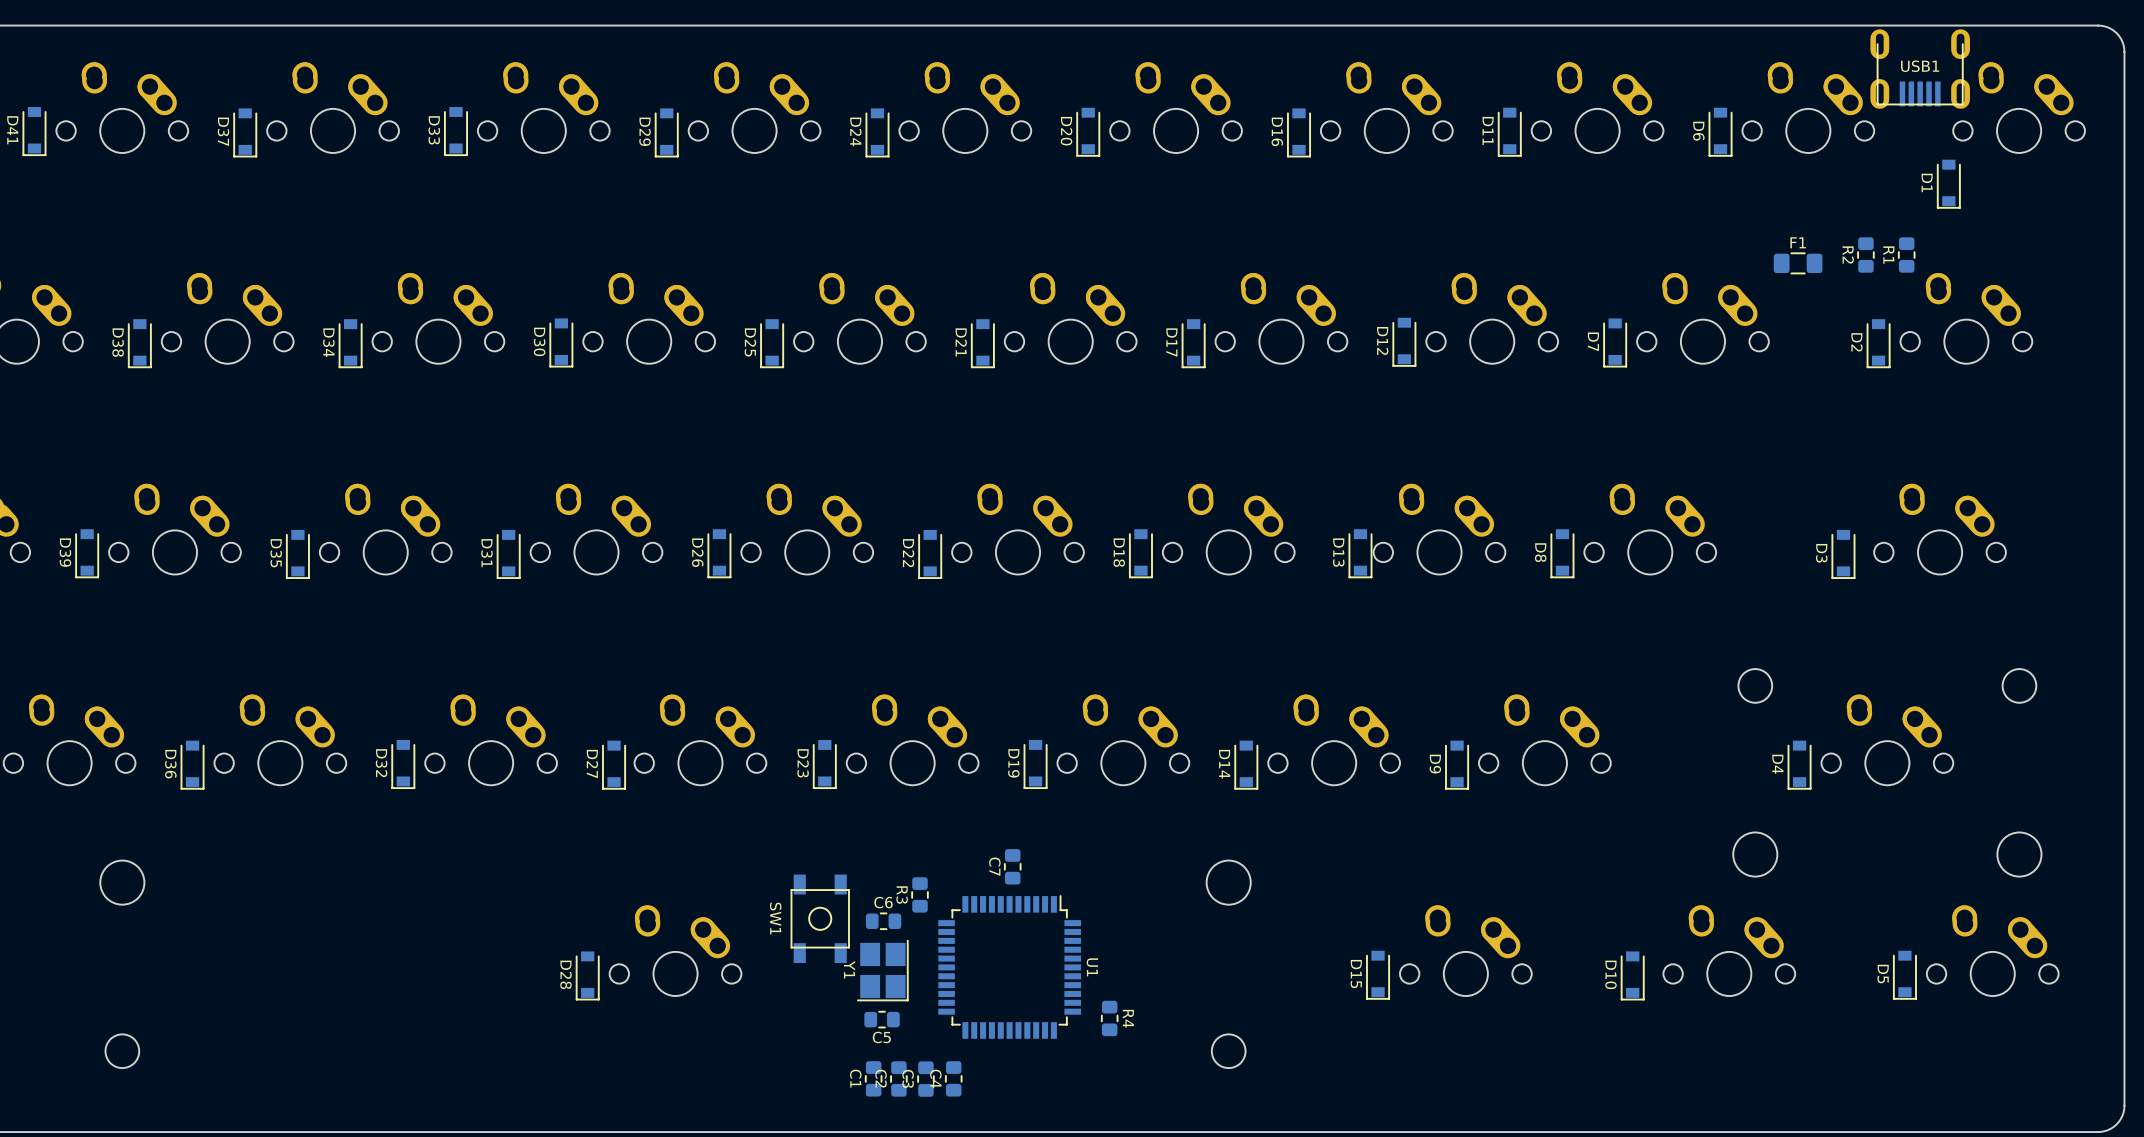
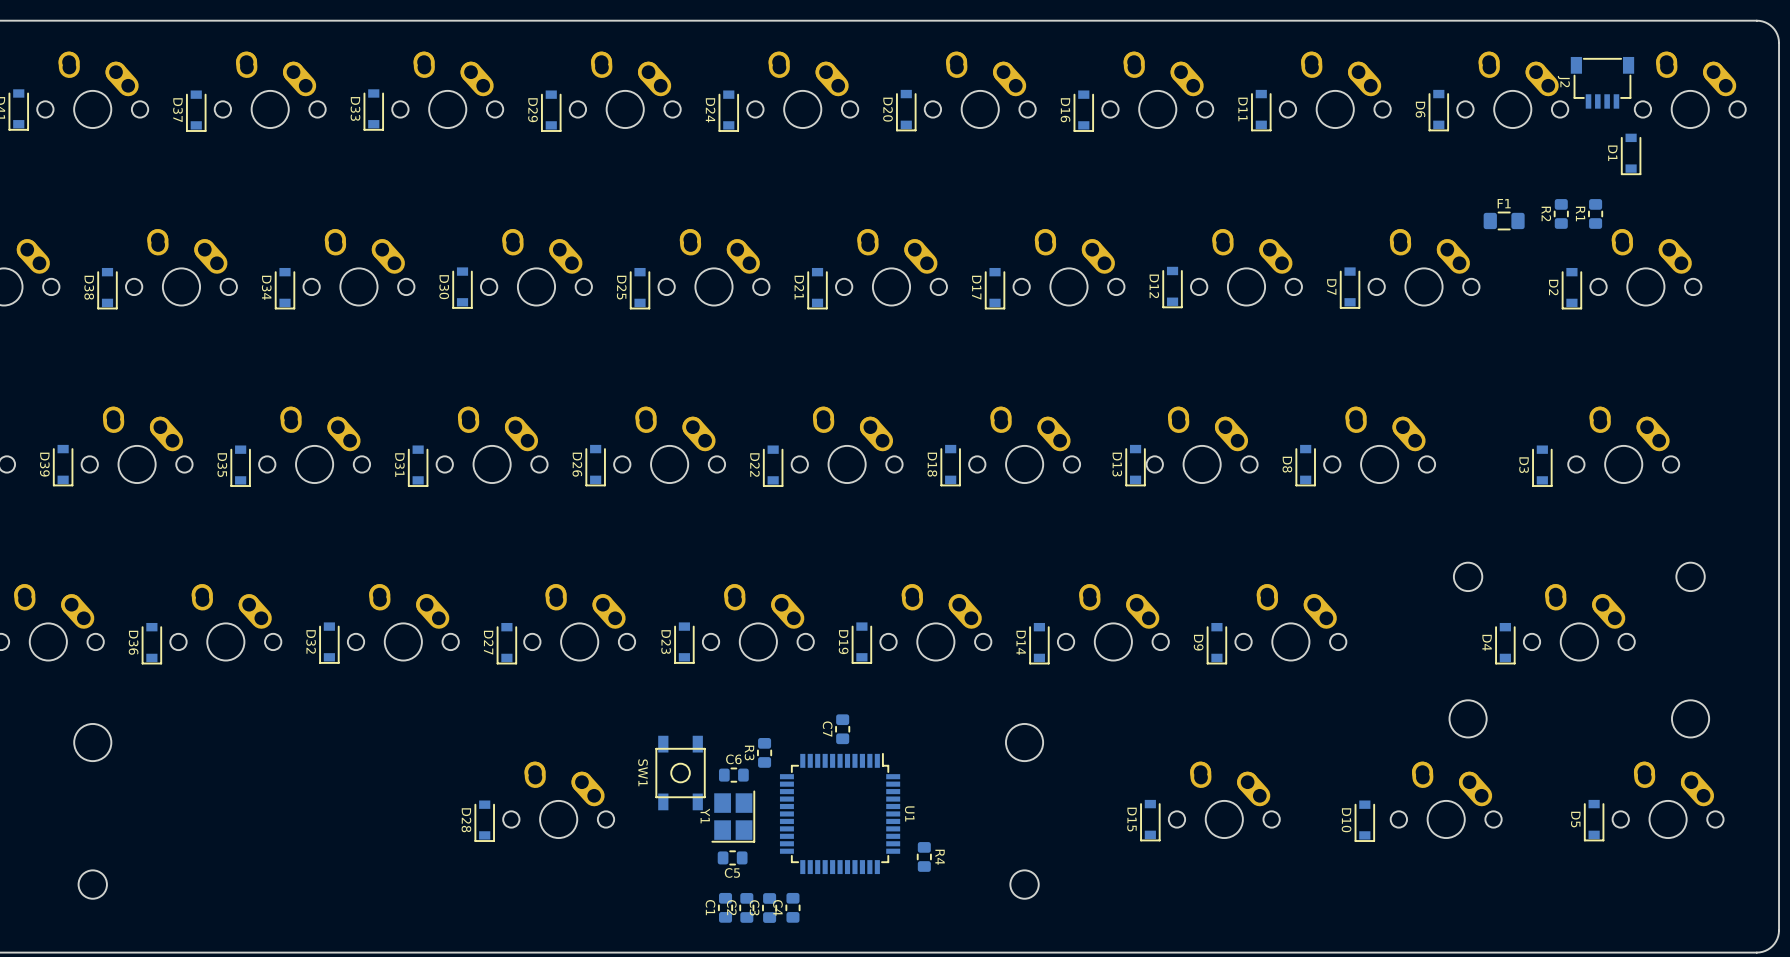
USB1: (1920, 69) -> none
J2: none -> (1602, 82)

